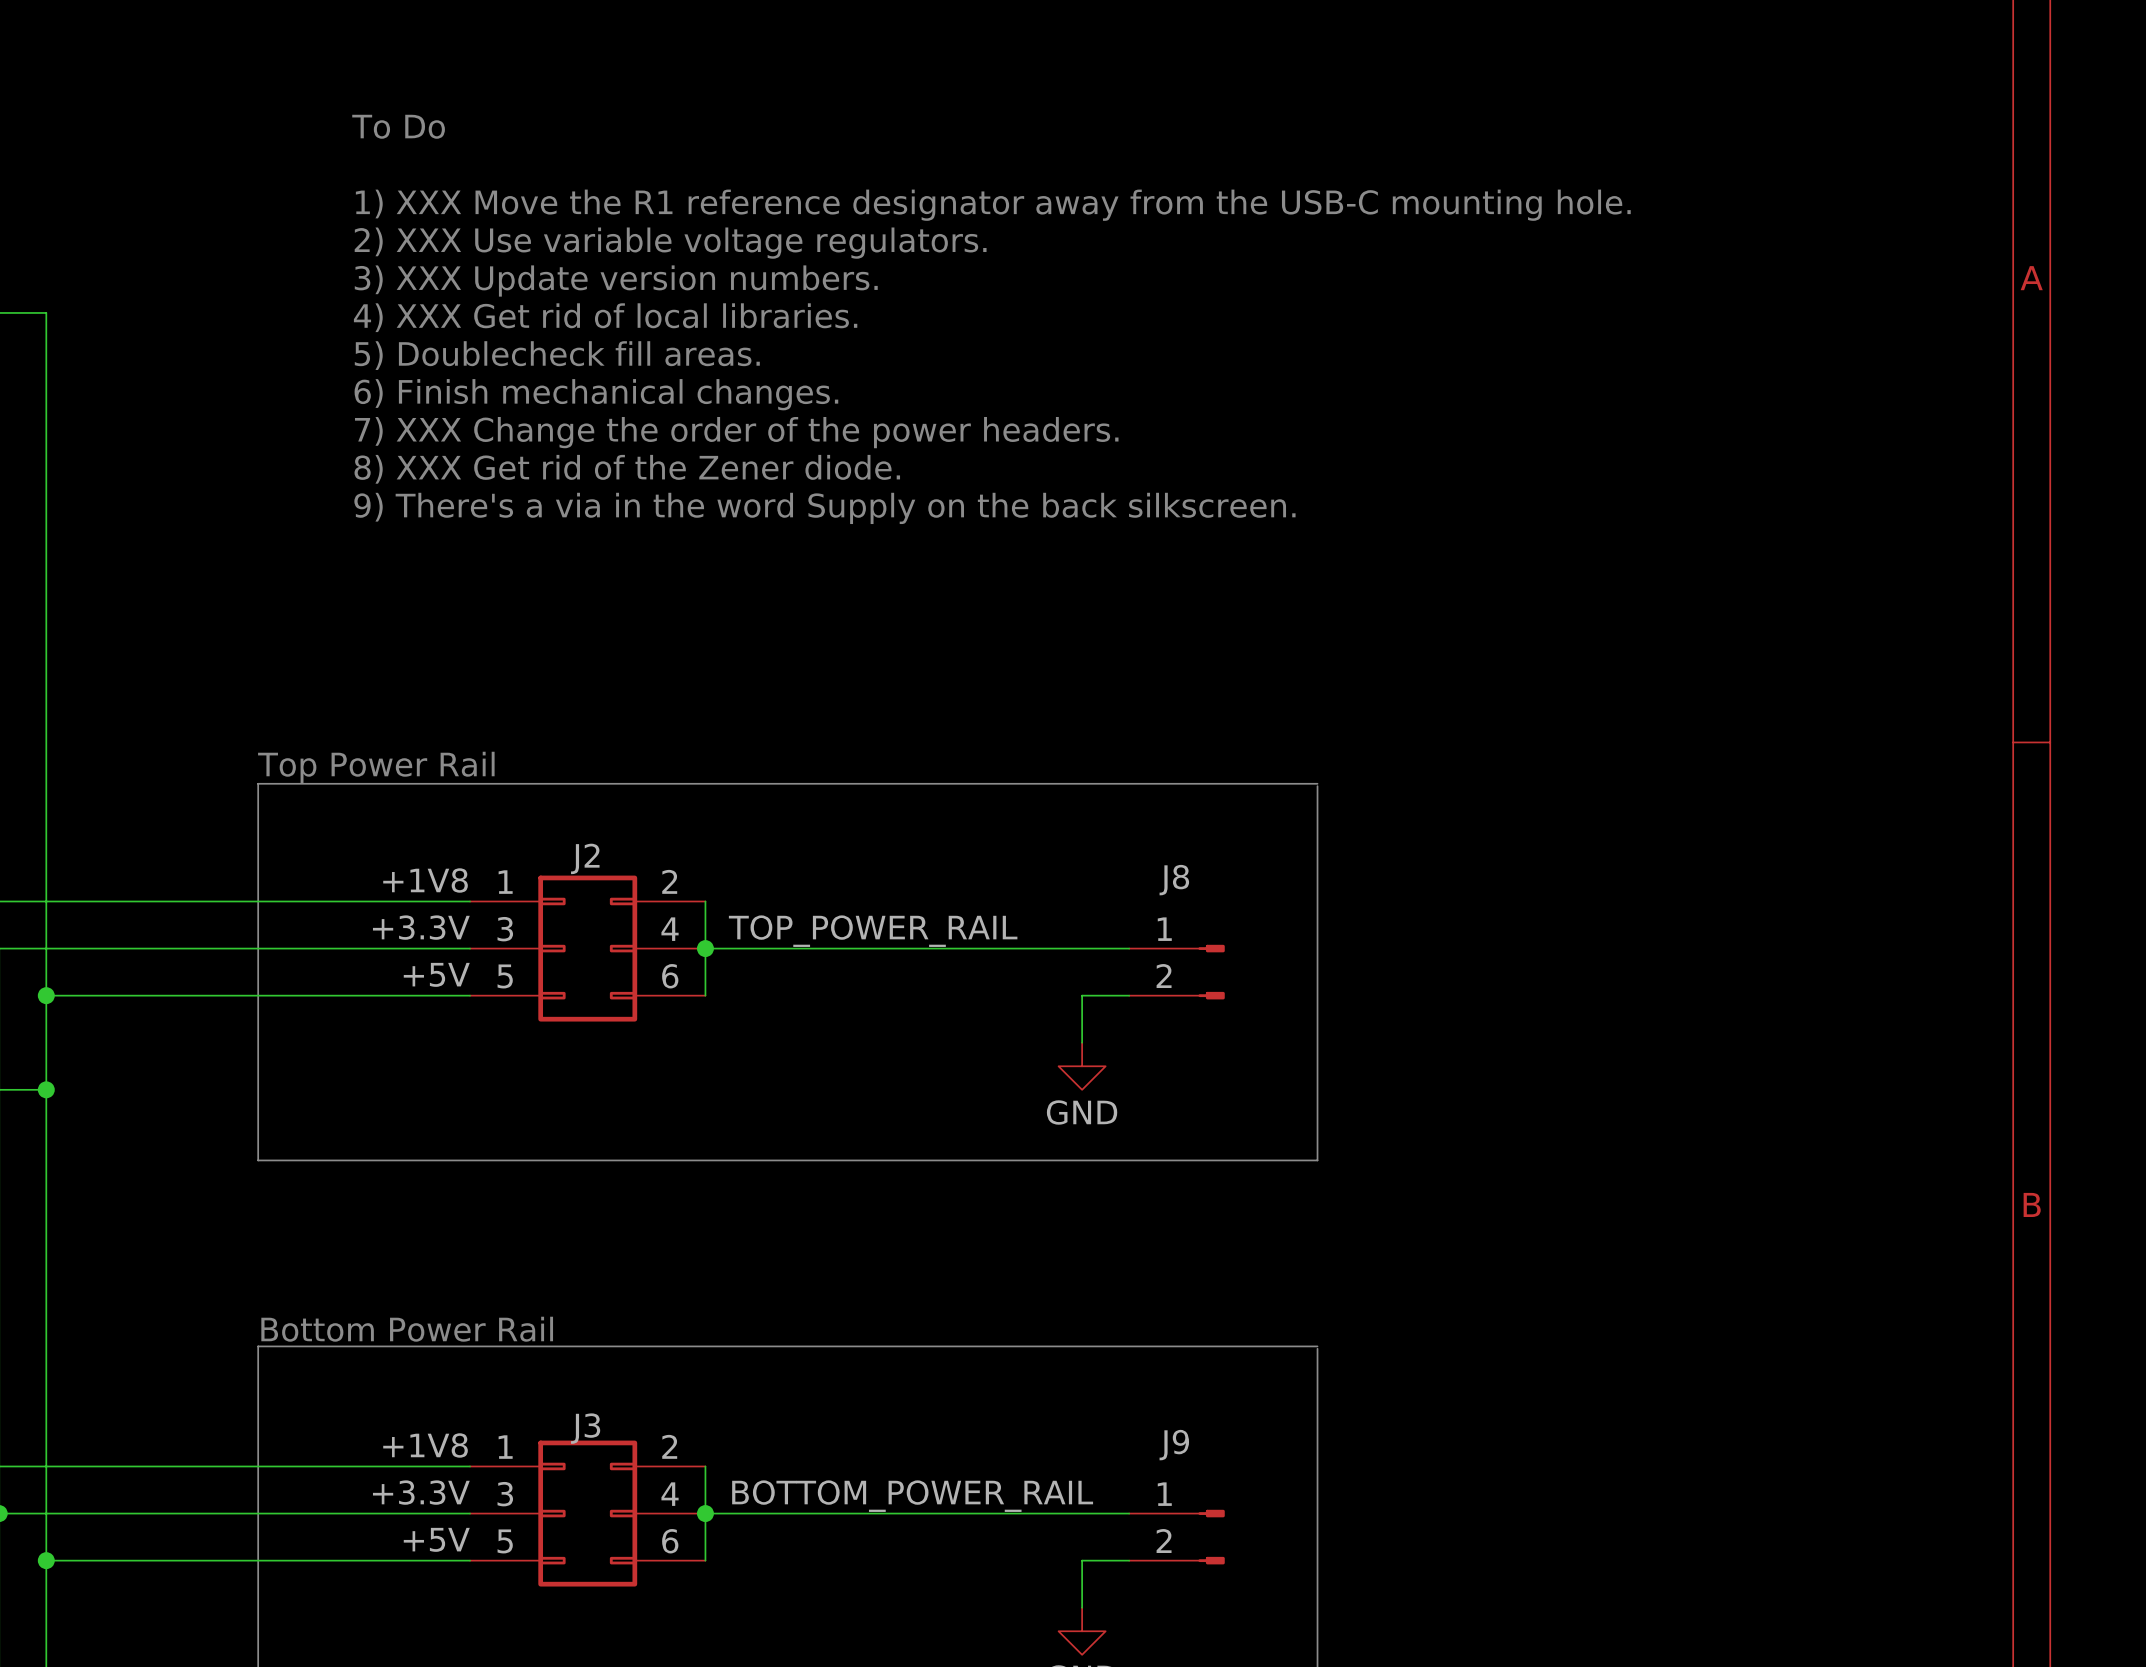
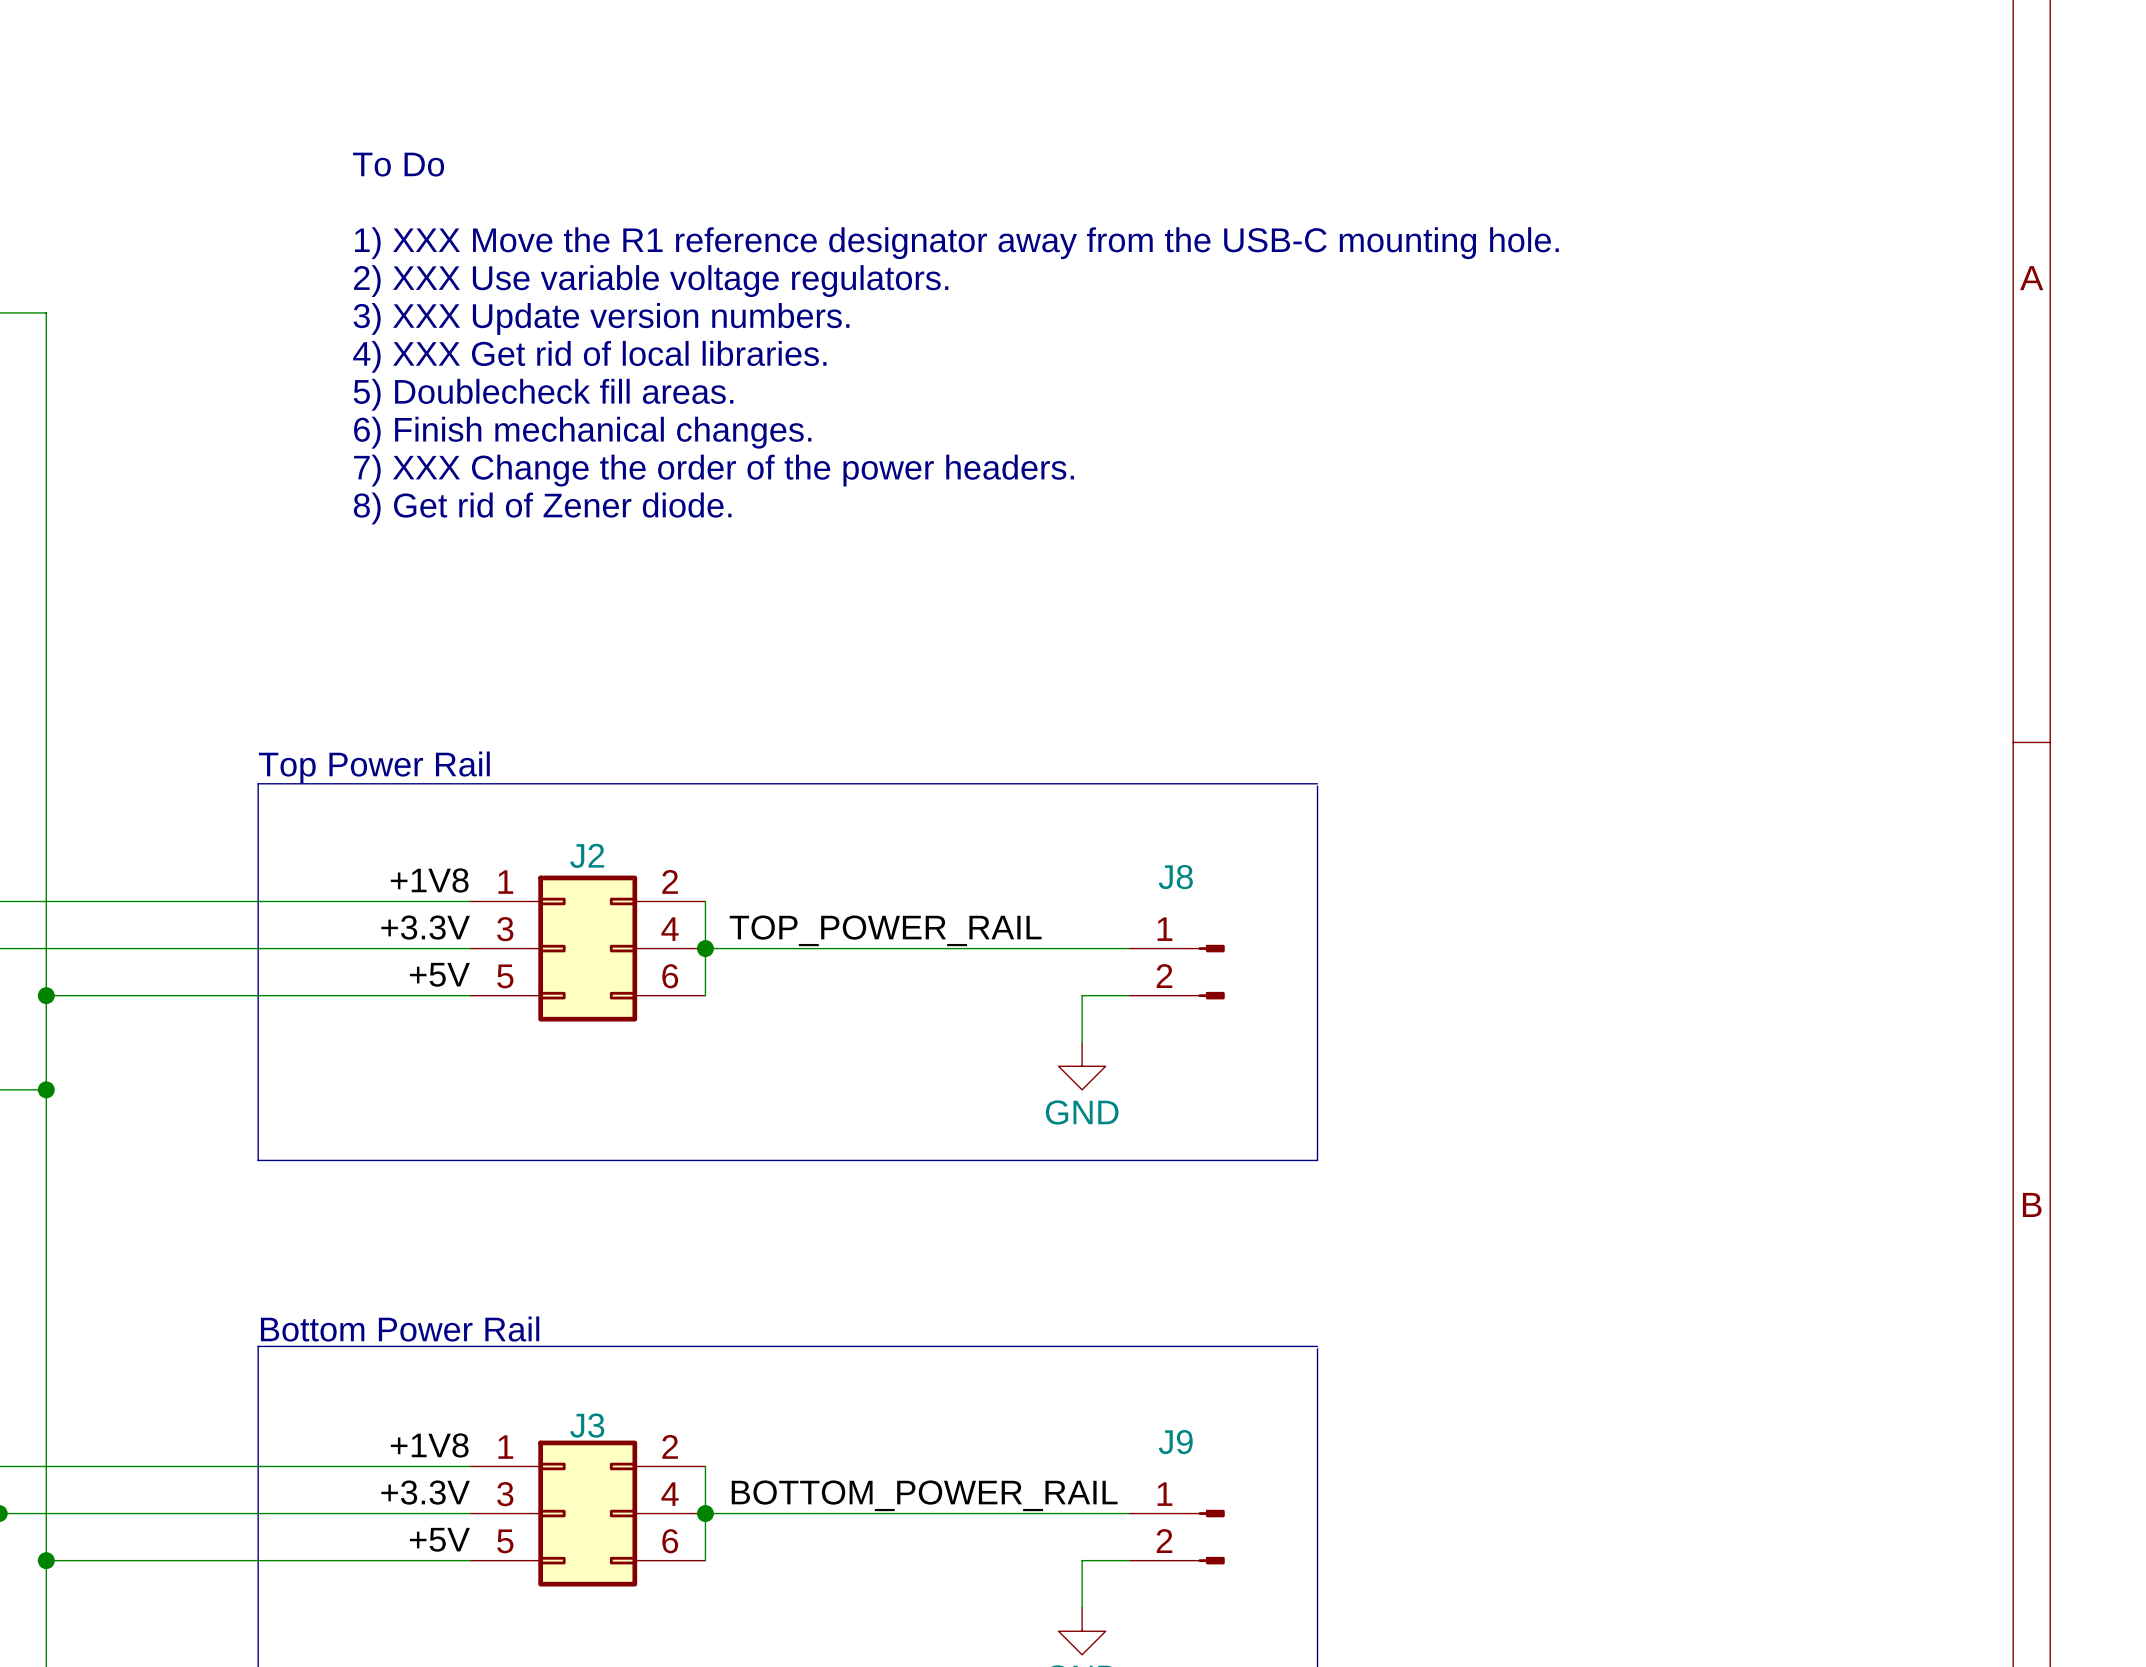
text position: To Do (398, 126) -> To Do (398, 164)
text: 1) XXX Move the R1 reference designator away from the USB-C mounting hole. (993, 205) -> none
text: 2) XXX Use variable voltage regulators. (670, 243) -> 1) XXX Move the R1 reference designator away from the USB-C mounting hole. (956, 243)
text: 3) XXX Update version numbers. (616, 281) -> 2) XXX Use variable voltage regulators. (651, 281)
text: 4) XXX Get rid of local libraries. (605, 317) -> 3) XXX Update version numbers. (601, 318)
text: 5) Doublecheck fill areas. (557, 355) -> 4) XXX Get rid of local libraries. (589, 356)
text: 6) Finish mechanical changes. (596, 394) -> 5) Doublecheck fill areas. (543, 394)
text: 7) XXX Change the order of the power headers. (736, 432) -> 6) Finish mechanical changes. (582, 432)
text: 8) XXX Get rid of the Zener diode. (627, 469) -> 7) XXX Change the order of the power headers. (714, 470)
text: 9) There's a via in the word Supply on the back silkscreen. (824, 508) -> 8) Get rid of Zener diode. (542, 508)

